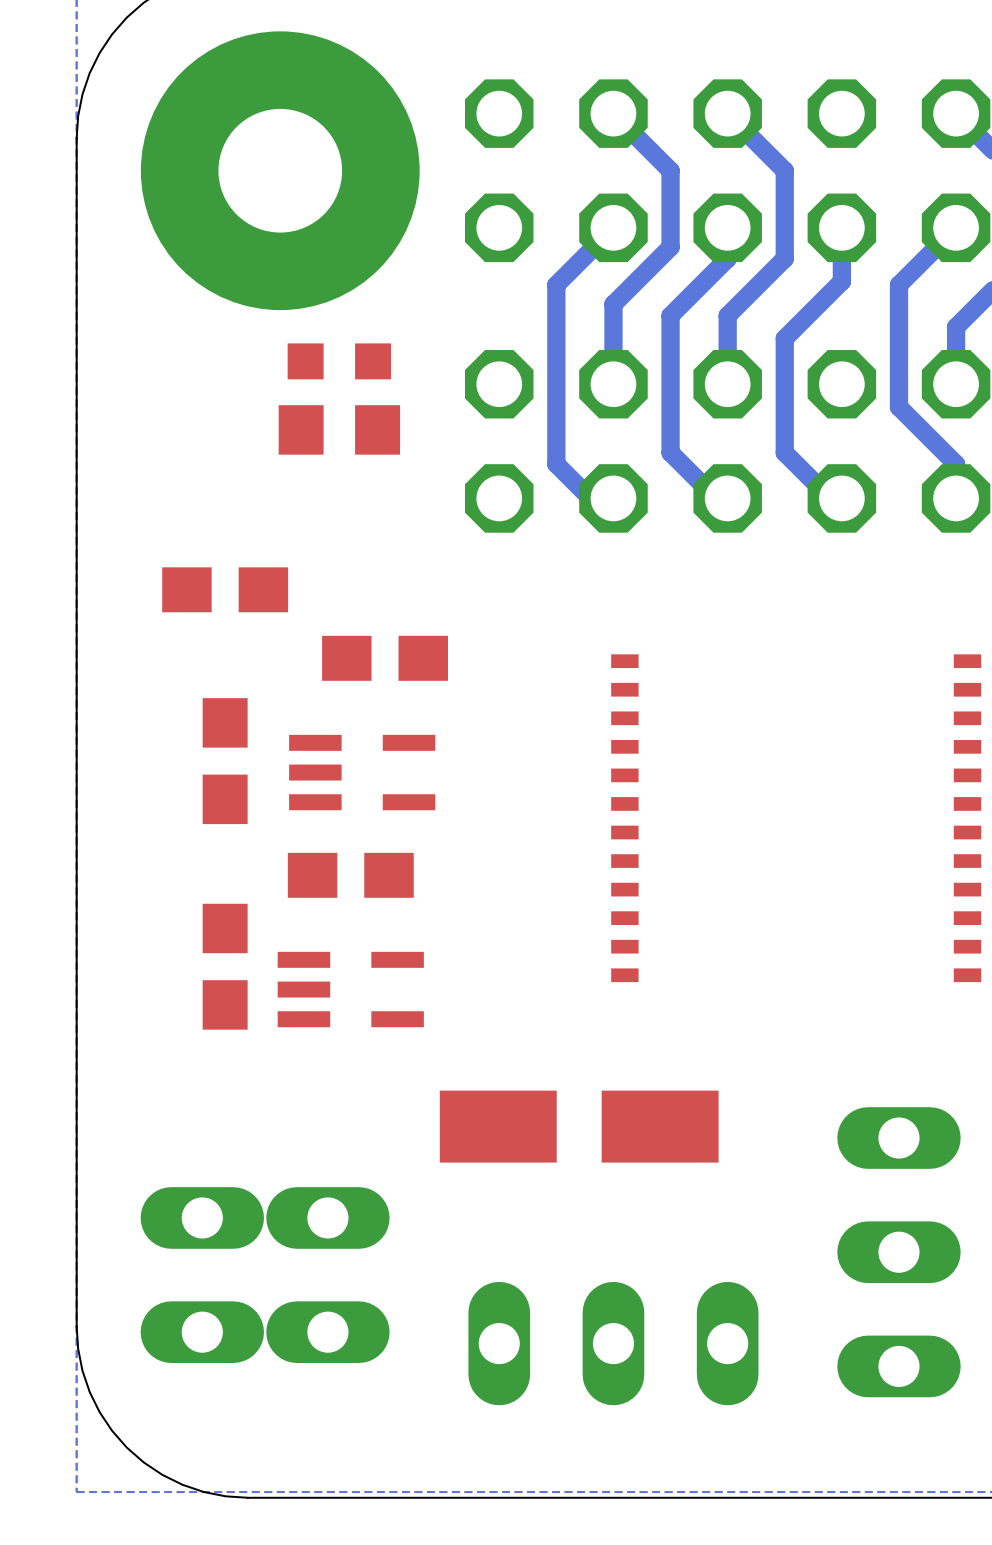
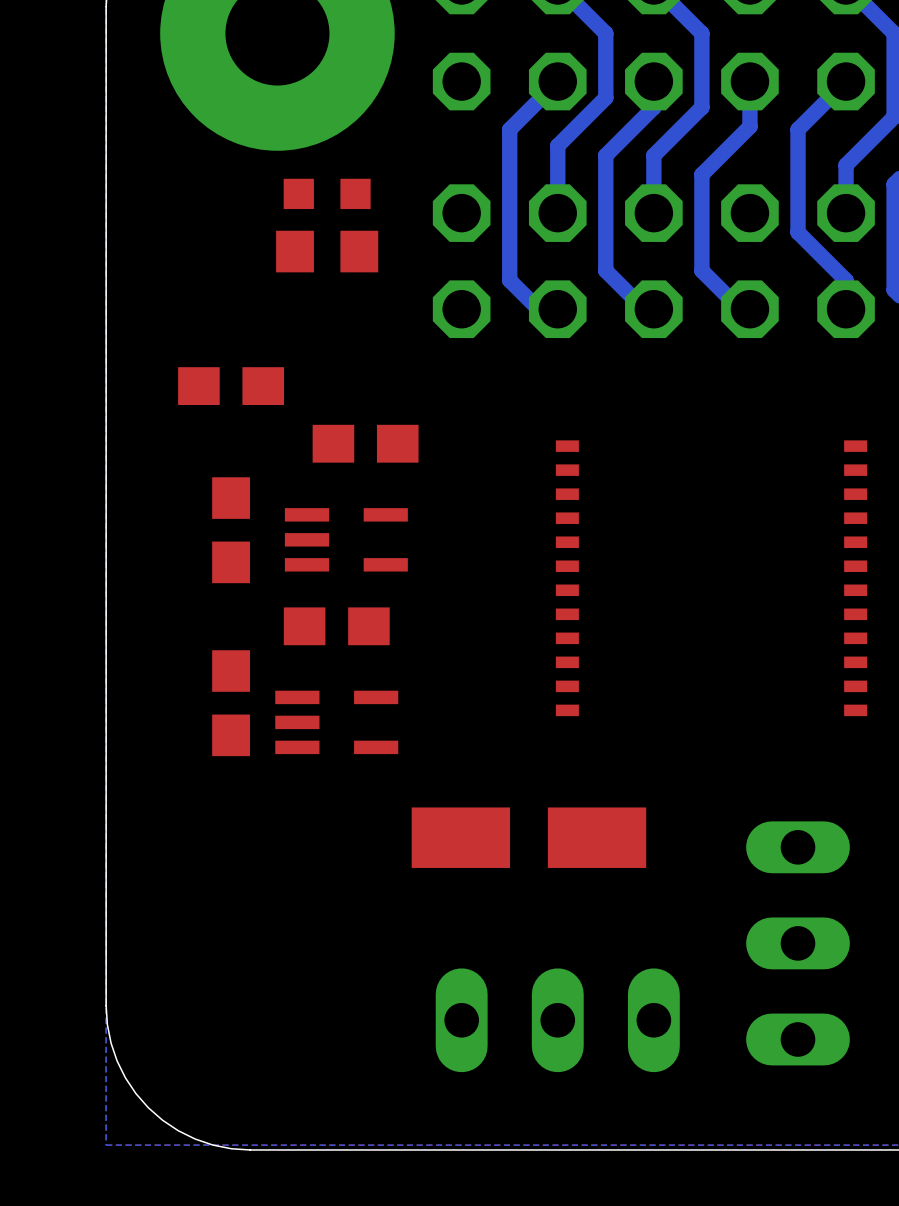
part: (202, 1275) -> none
part: (327, 1275) -> none

